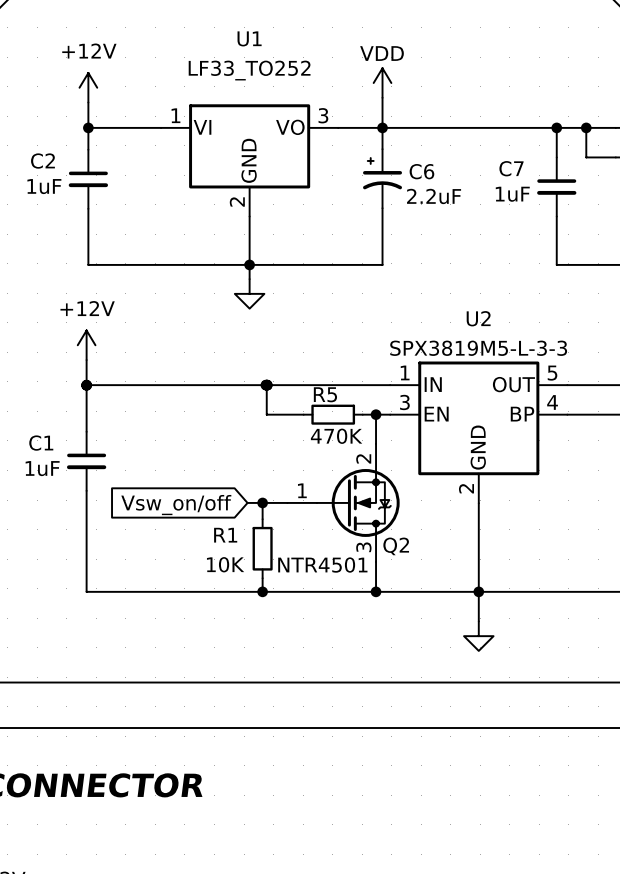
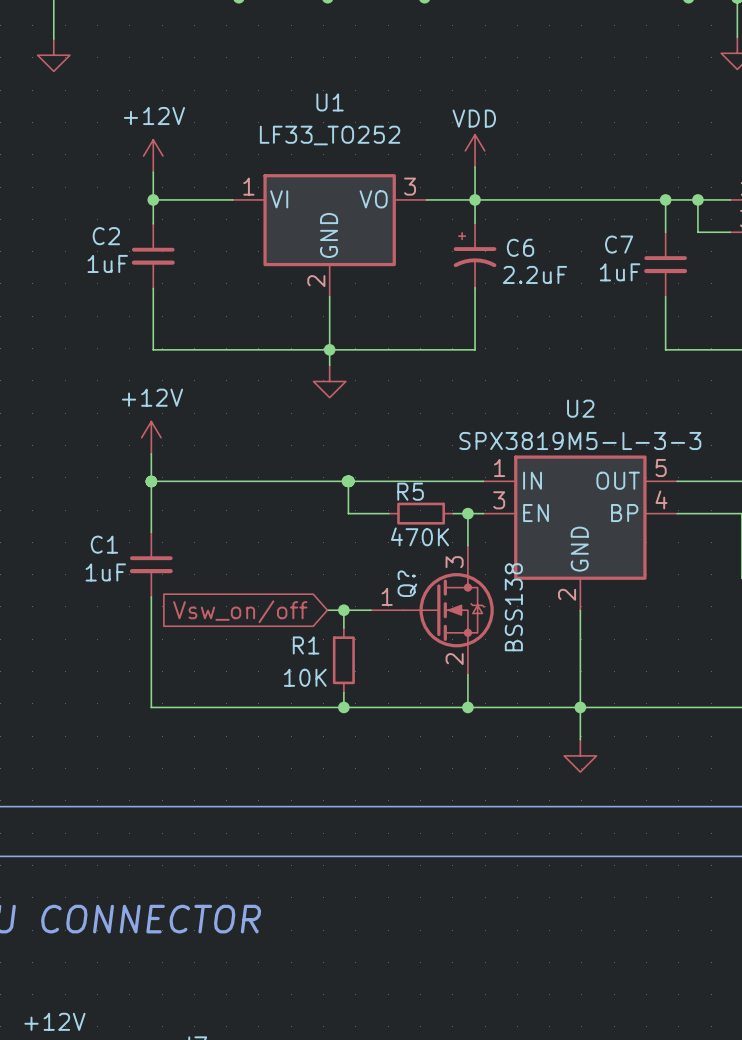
Q2: NTR4501 (343, 502) -> none
Q?: none -> BSS138 (432, 610)

